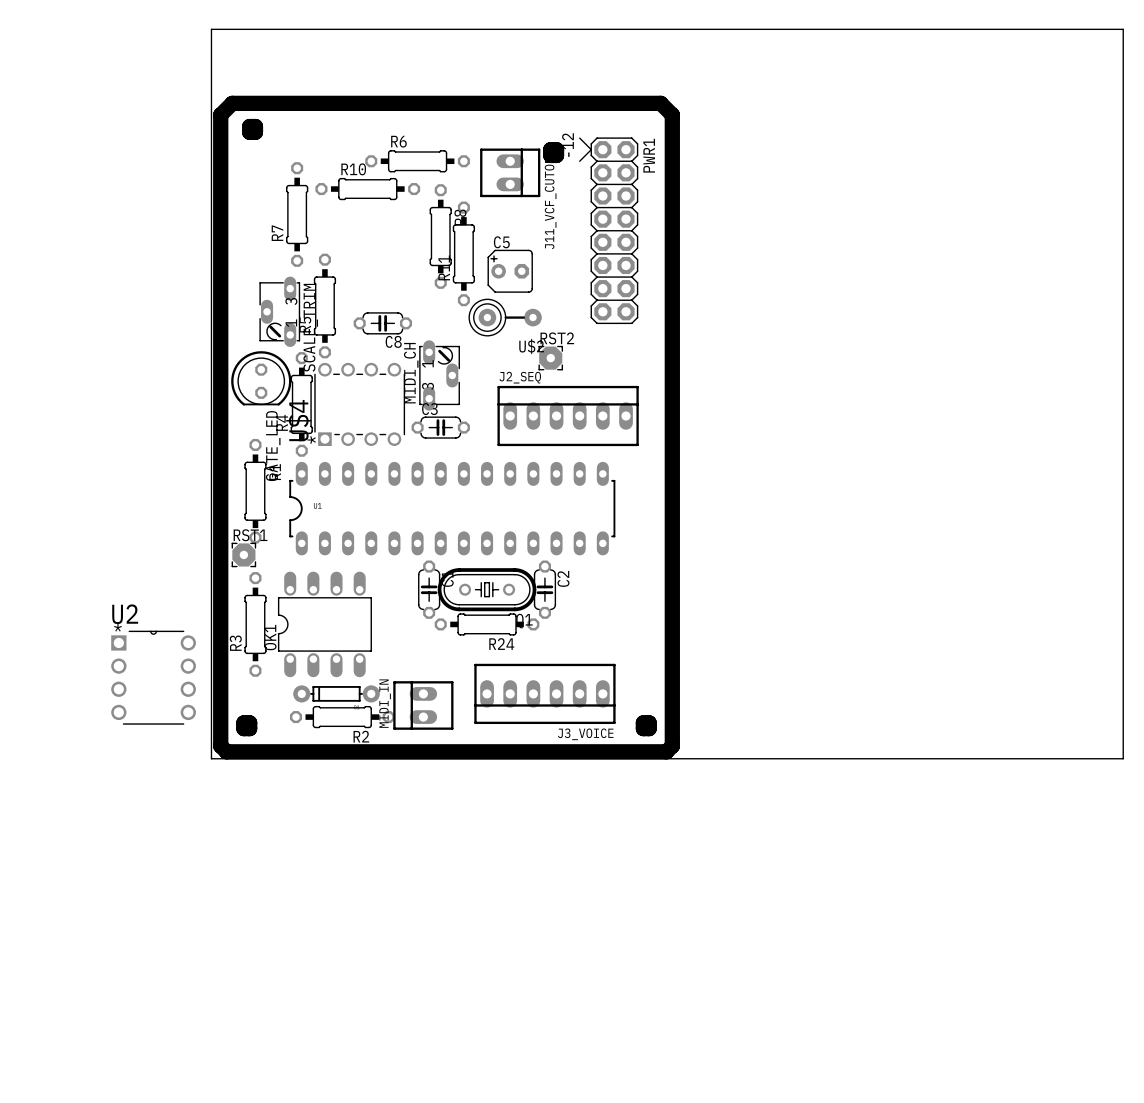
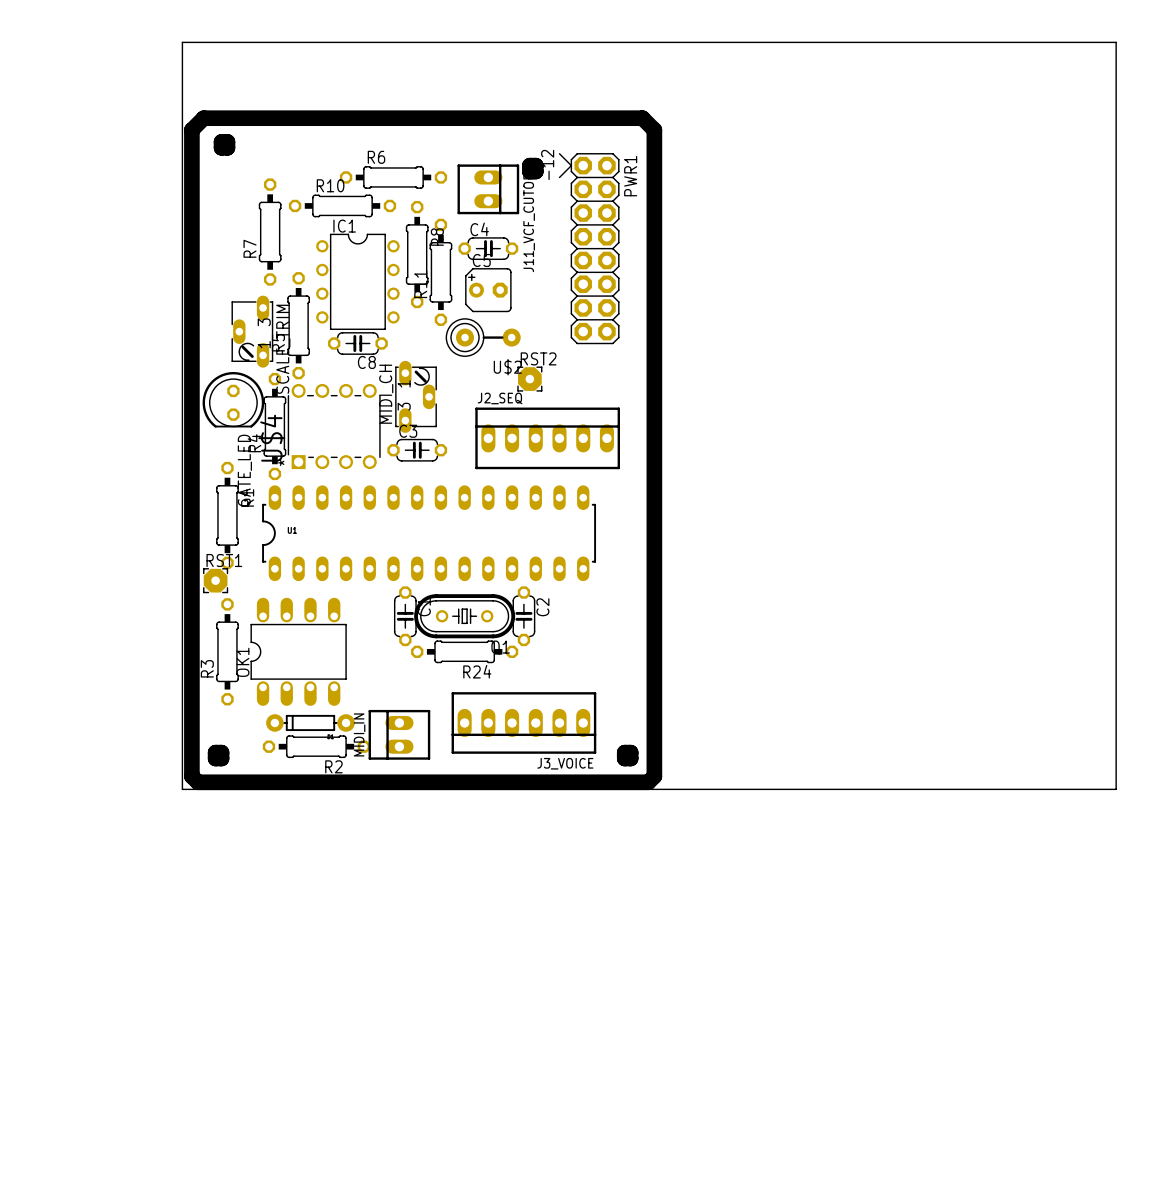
C4: none -> (488, 248)
IC1: none -> (357, 281)
U2: (153, 677) -> none

